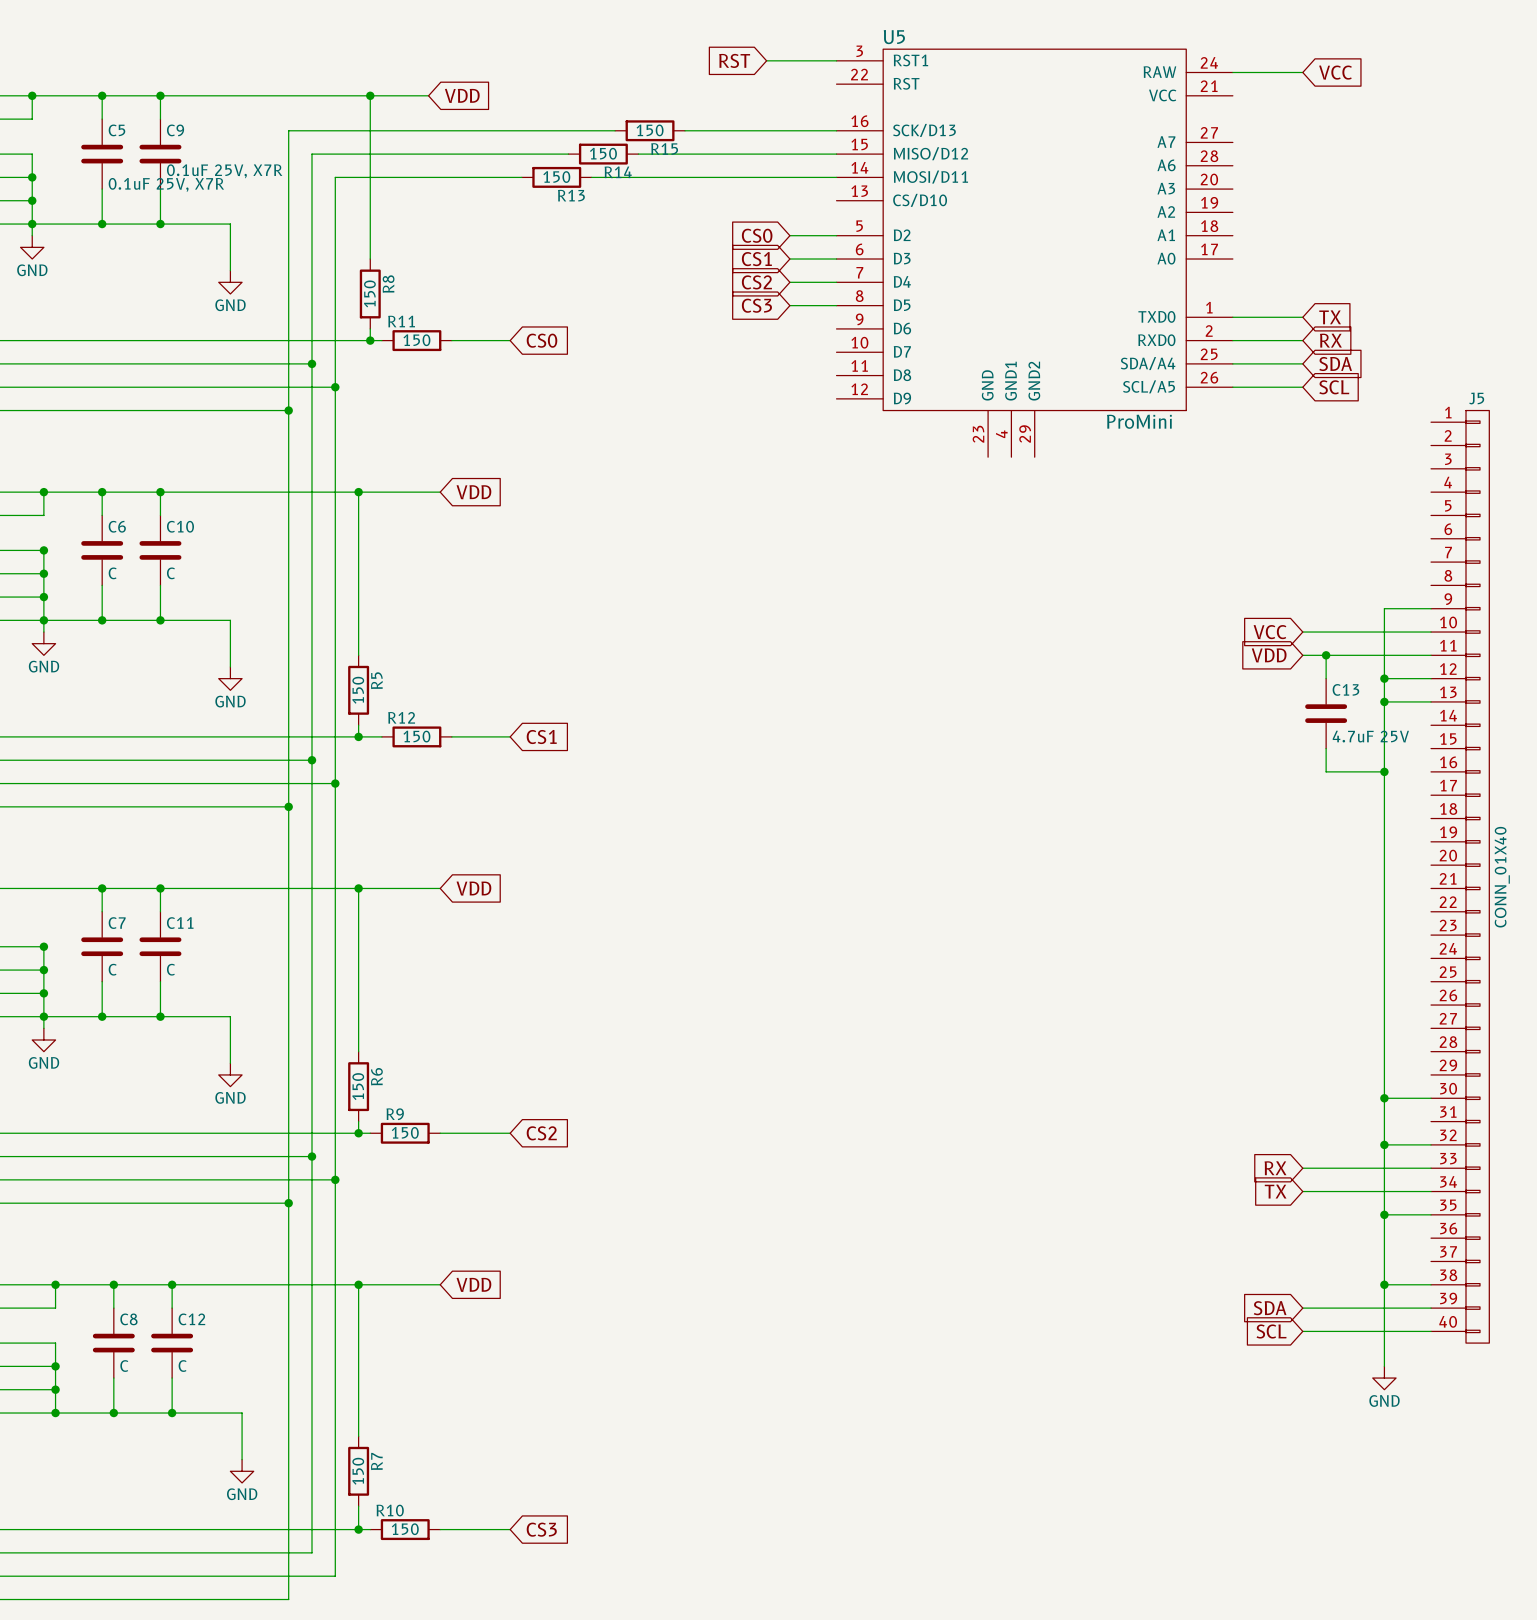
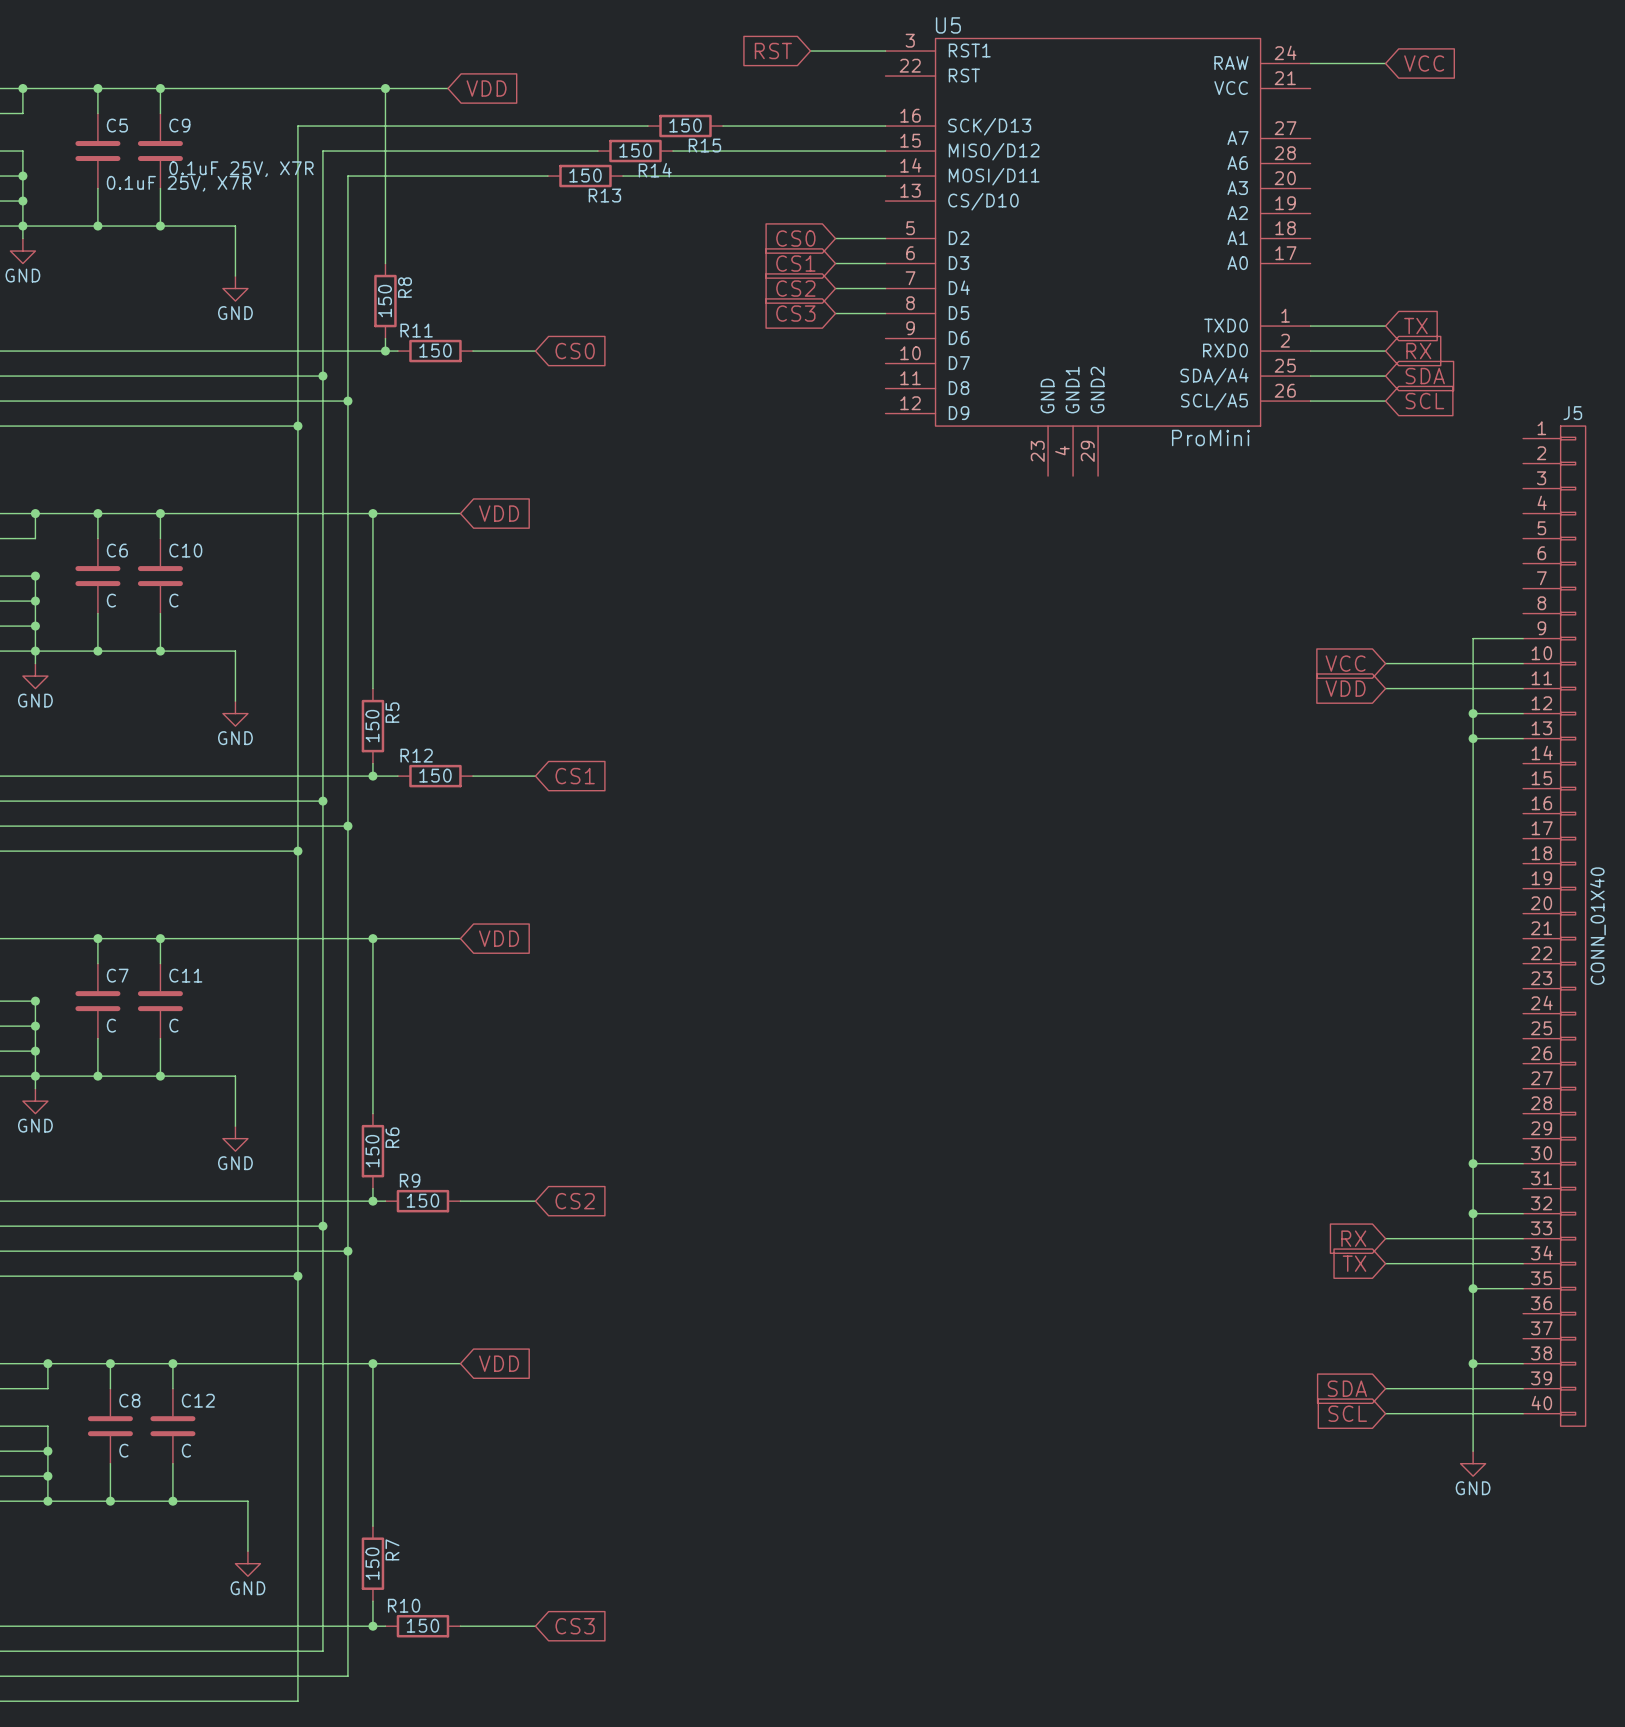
wire: (1326, 655) (1326, 678) -> none
junction: (1326, 655) -> none
C13: 4.7uF 25V (1326, 713) -> none
wire: (1326, 748) (1326, 771) (1384, 771) -> none
junction: (1384, 771) -> none

